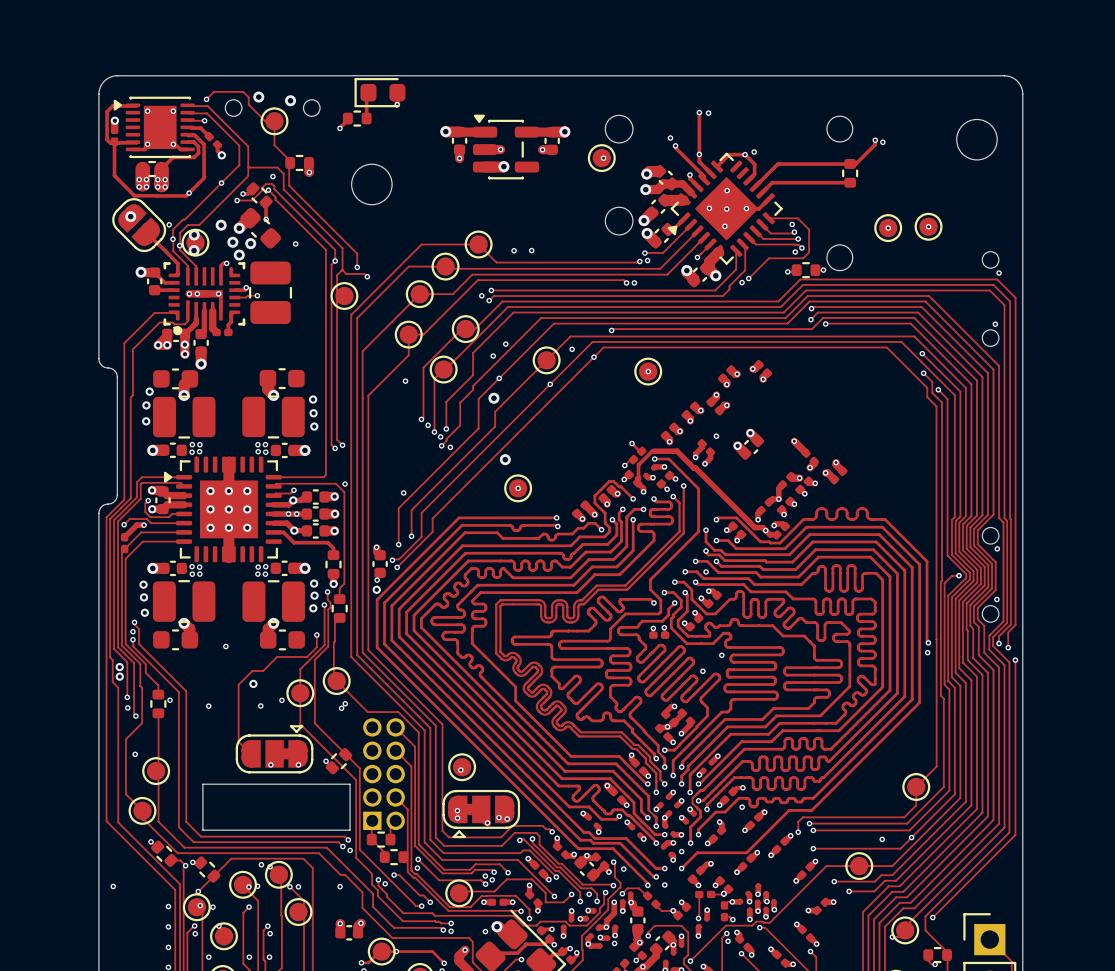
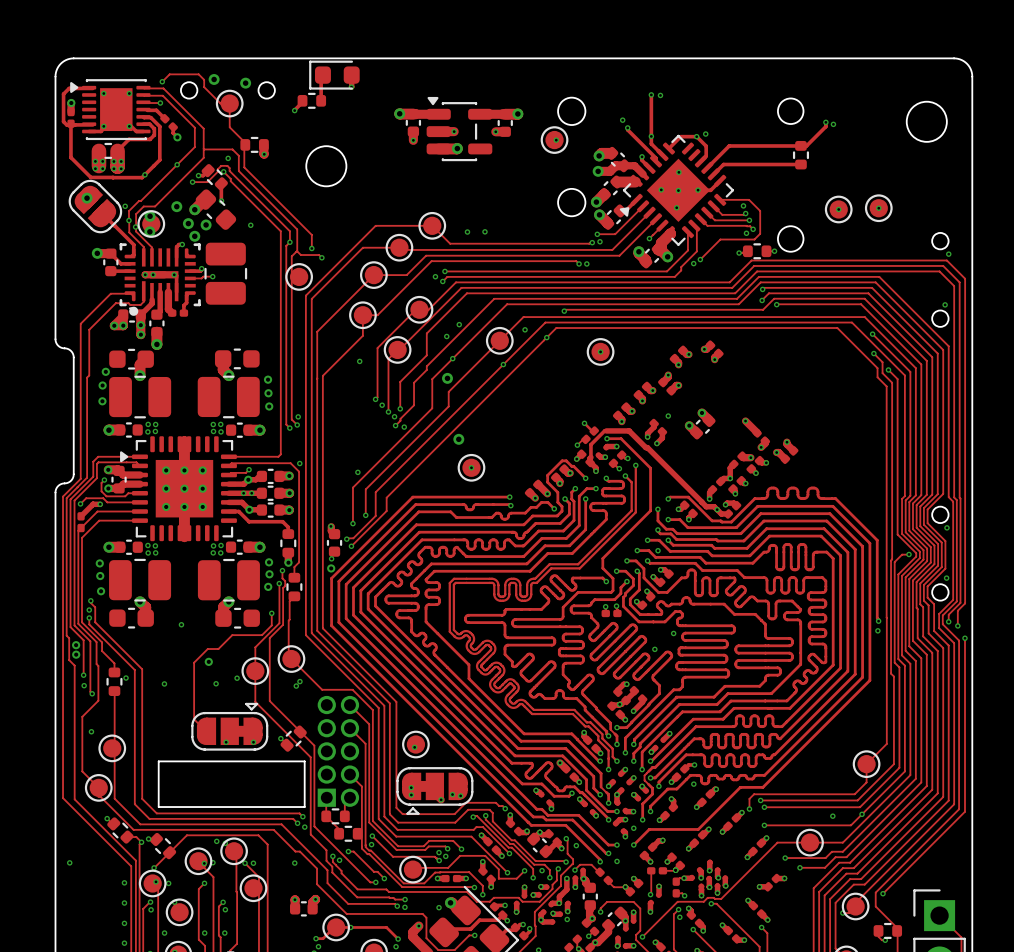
via: none -> (298, 416)

